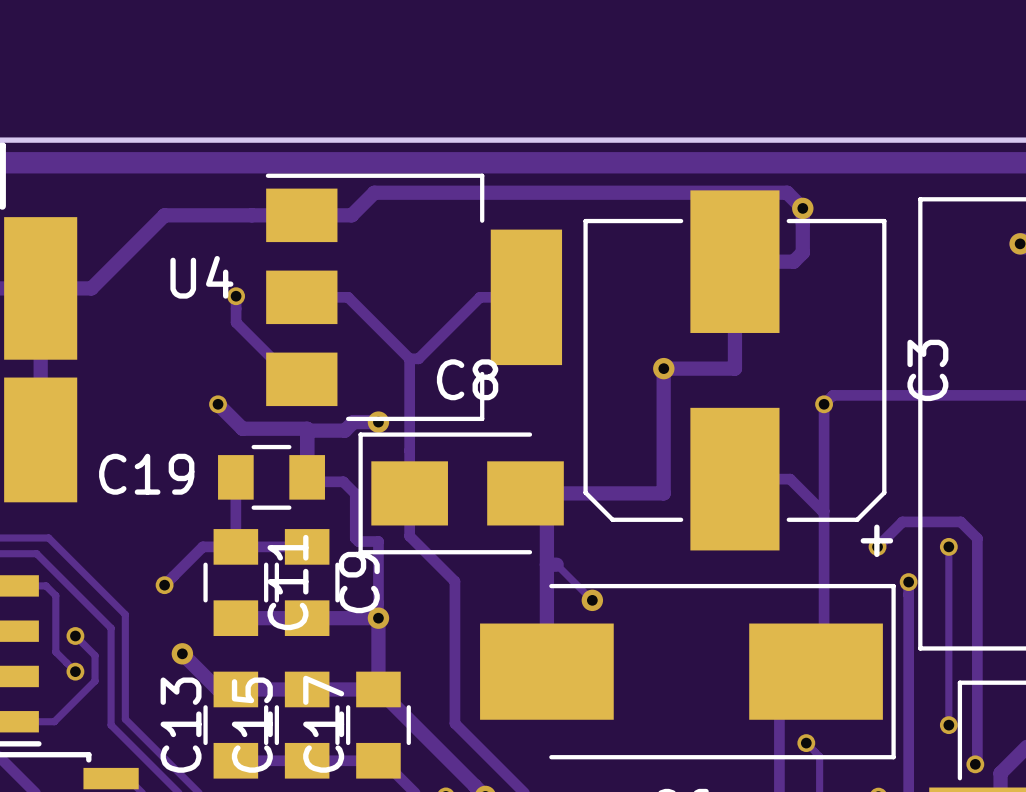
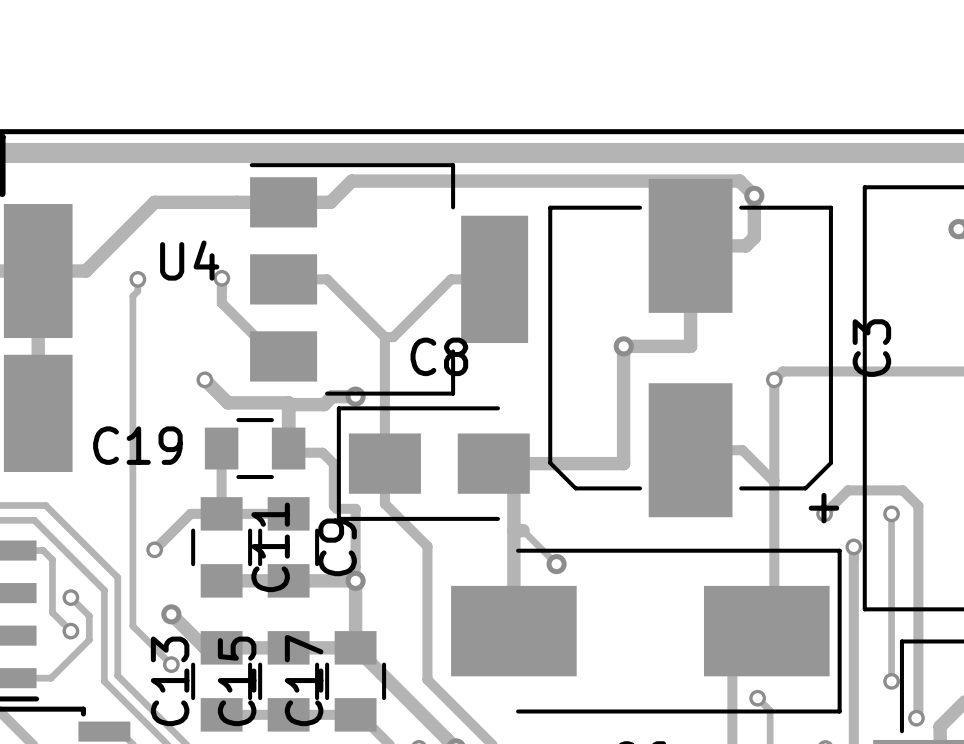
track: none -> (137, 279) (137, 291) (132, 296) (132, 626) (171, 664)
via: none -> (137, 279)
via: none -> (171, 664)

